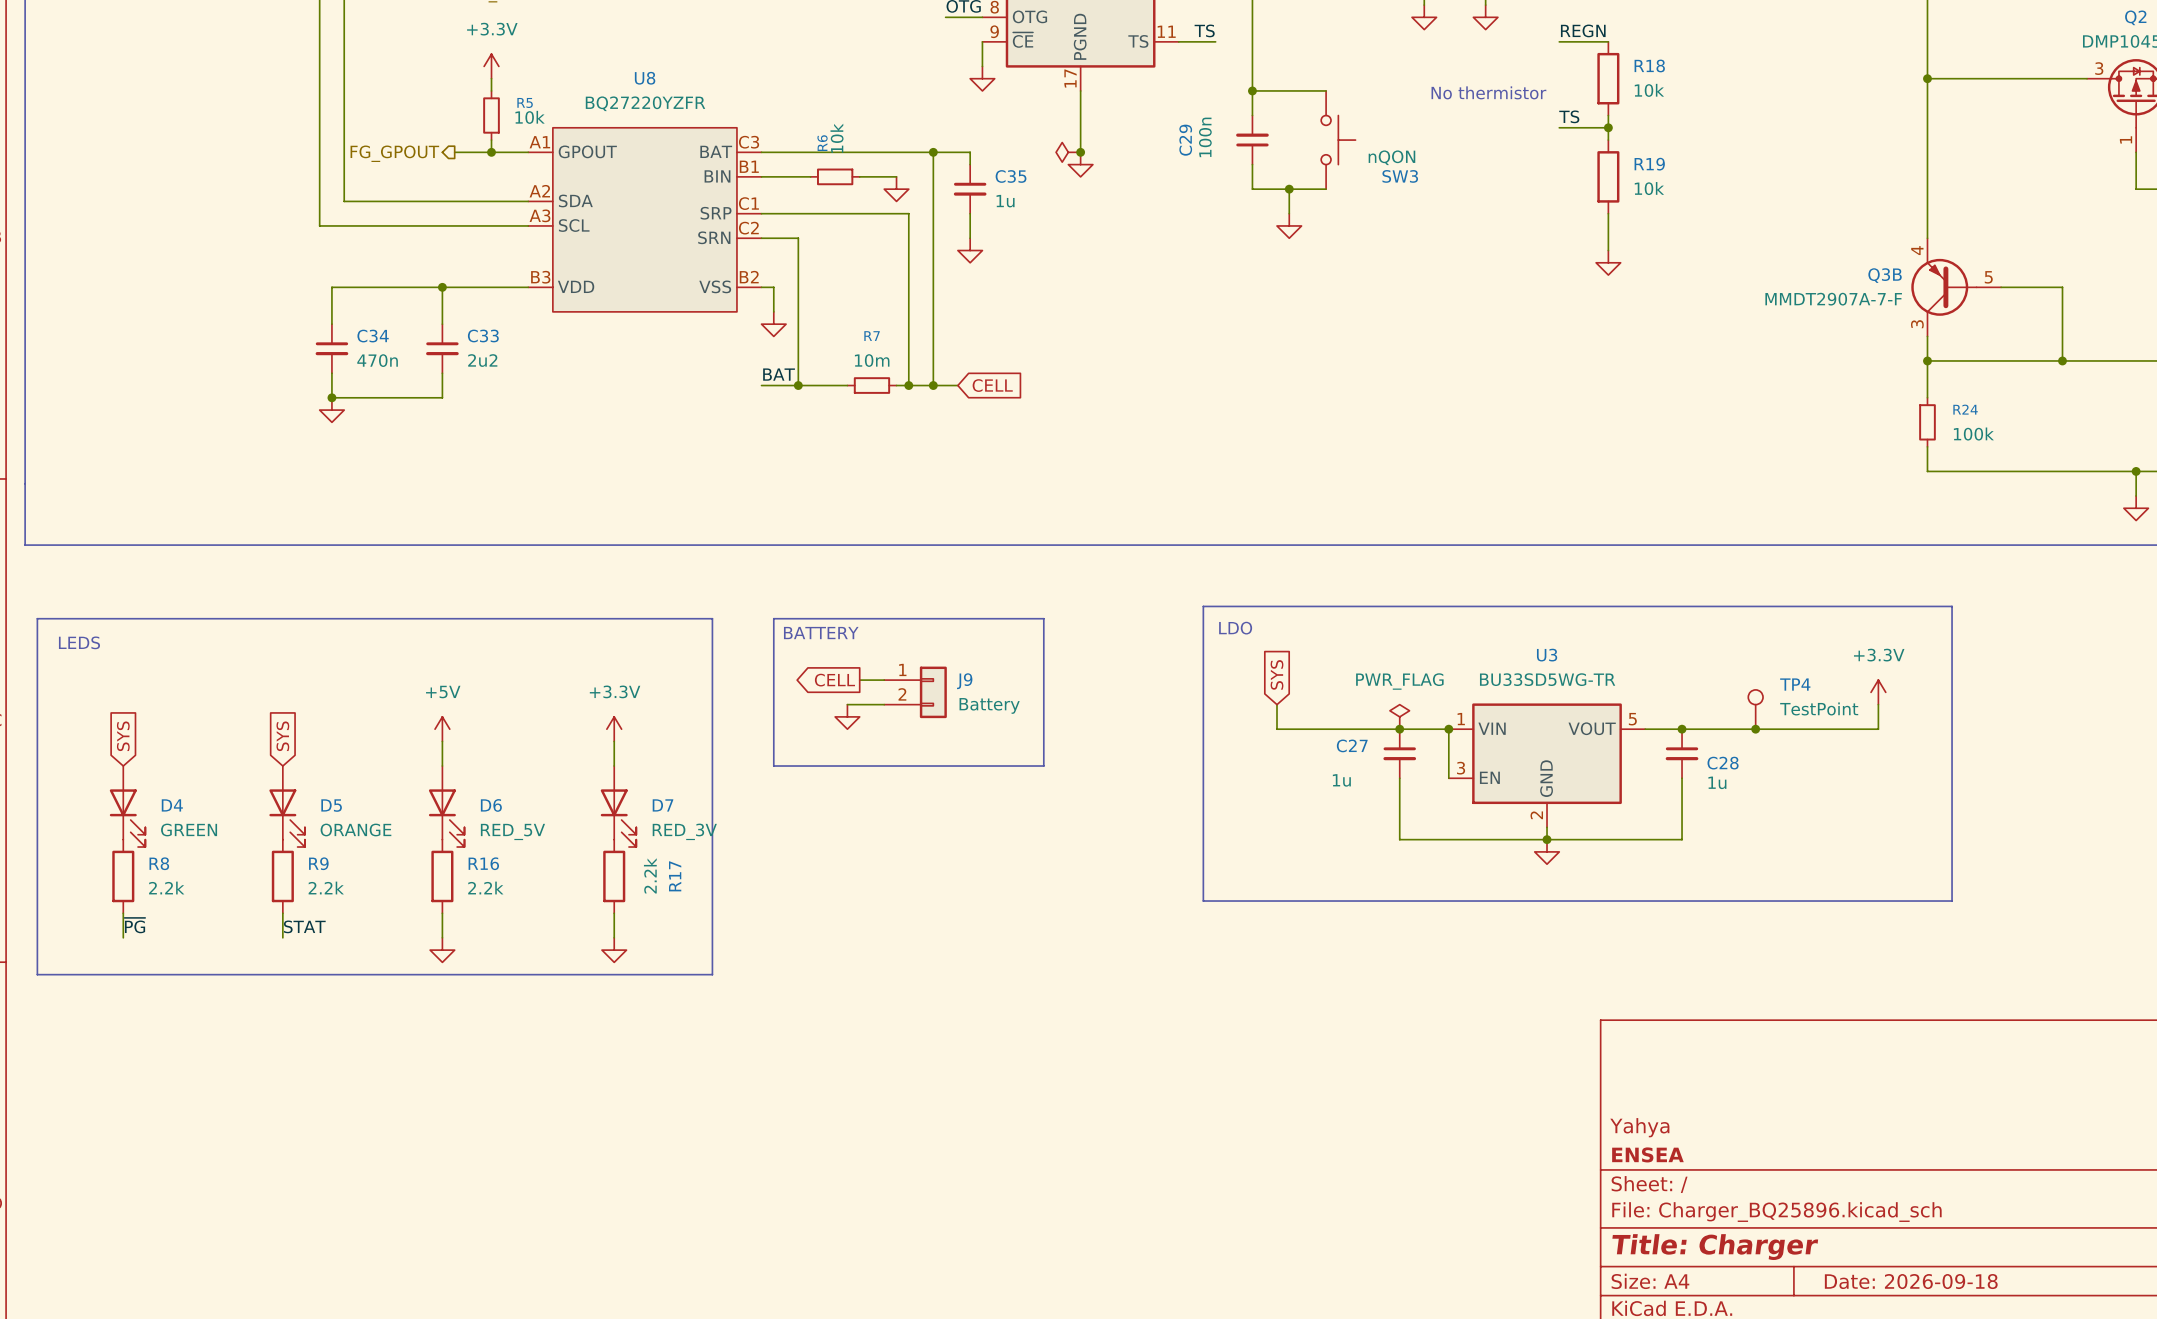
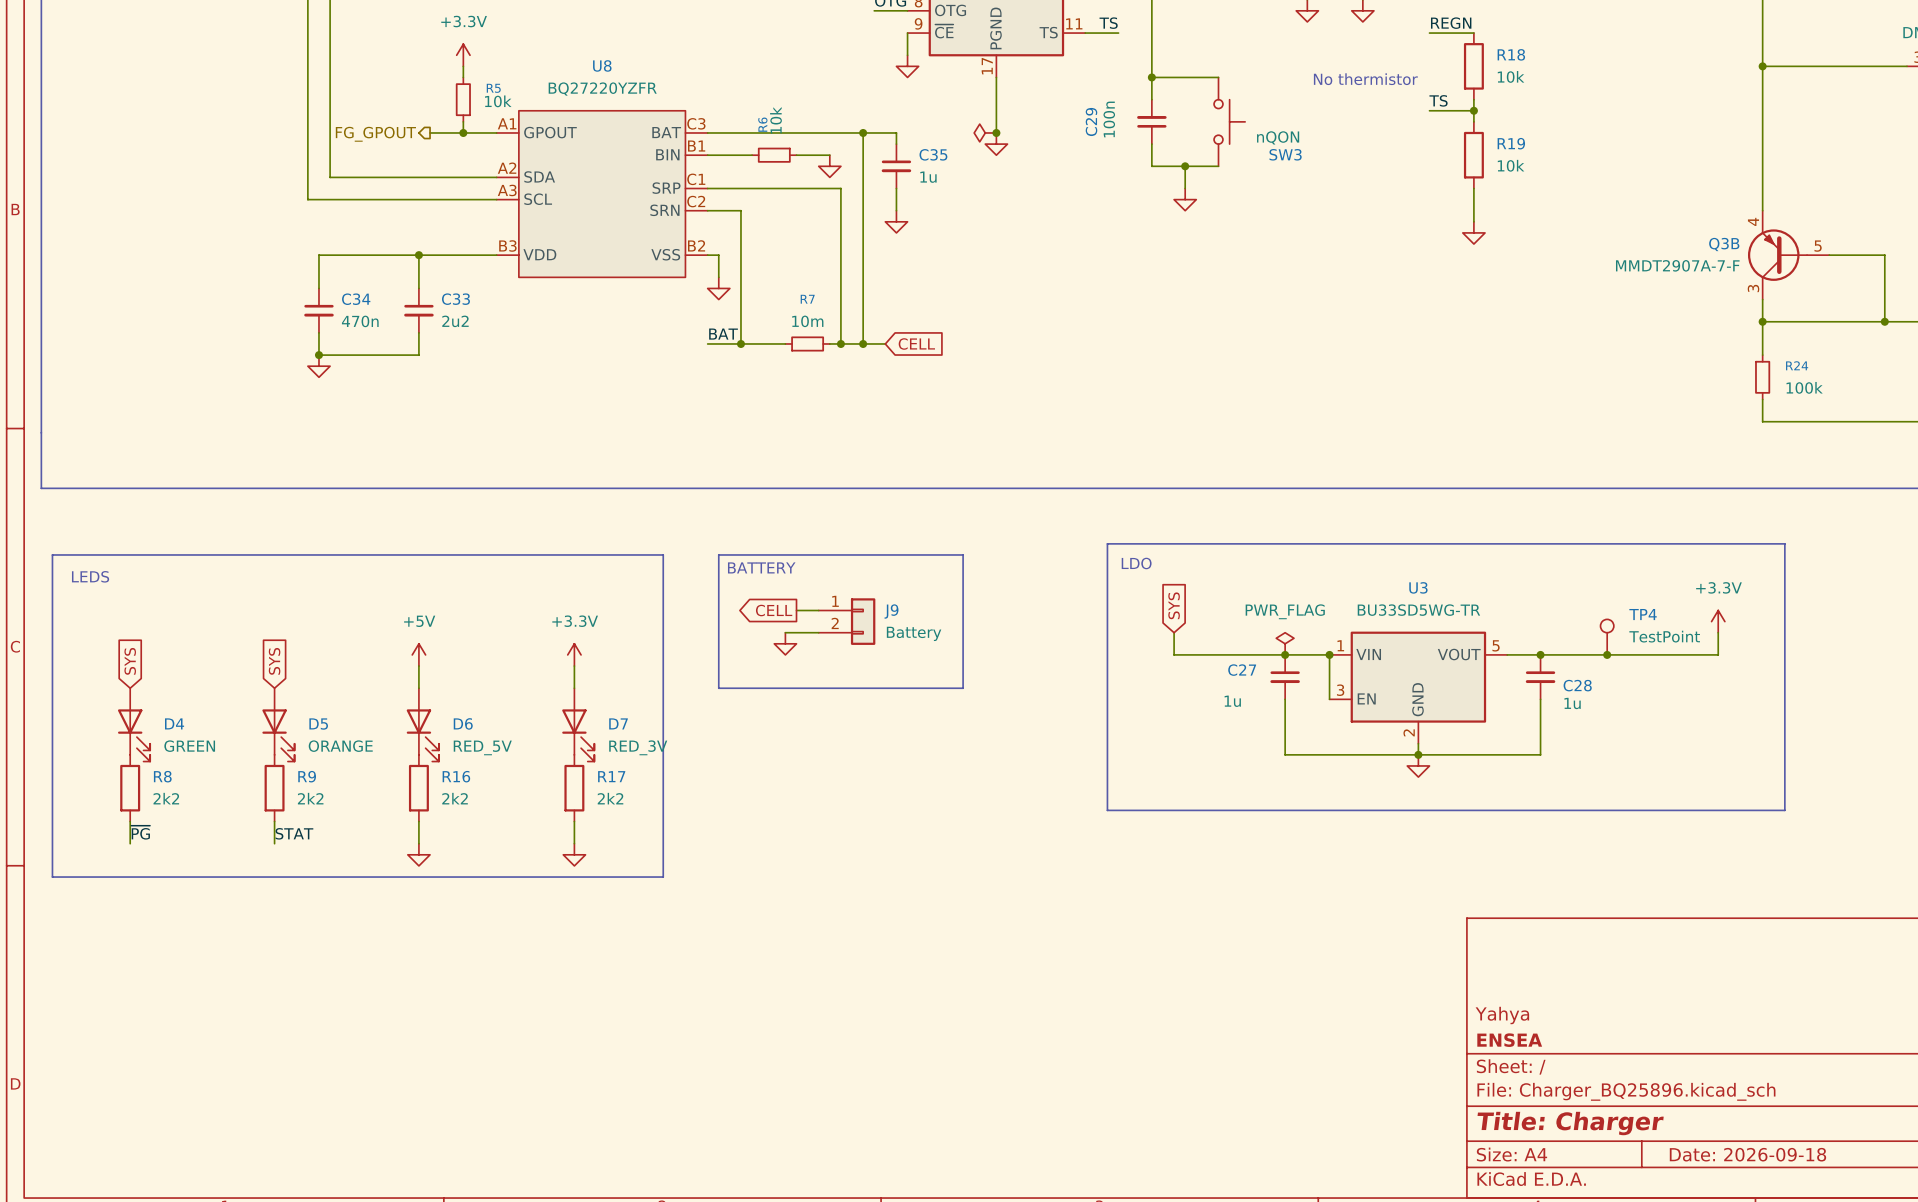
R17 value: 2.2k (650, 875) -> 2k2 (610, 798)
R17 name rotation: 0° (675, 876) -> 90° clockwise (611, 776)
R8 value: 2.2k (166, 888) -> 2k2 (166, 798)
R9 value: 2.2k (326, 888) -> 2k2 (310, 798)
R16 value: 2.2k (485, 888) -> 2k2 (455, 798)

